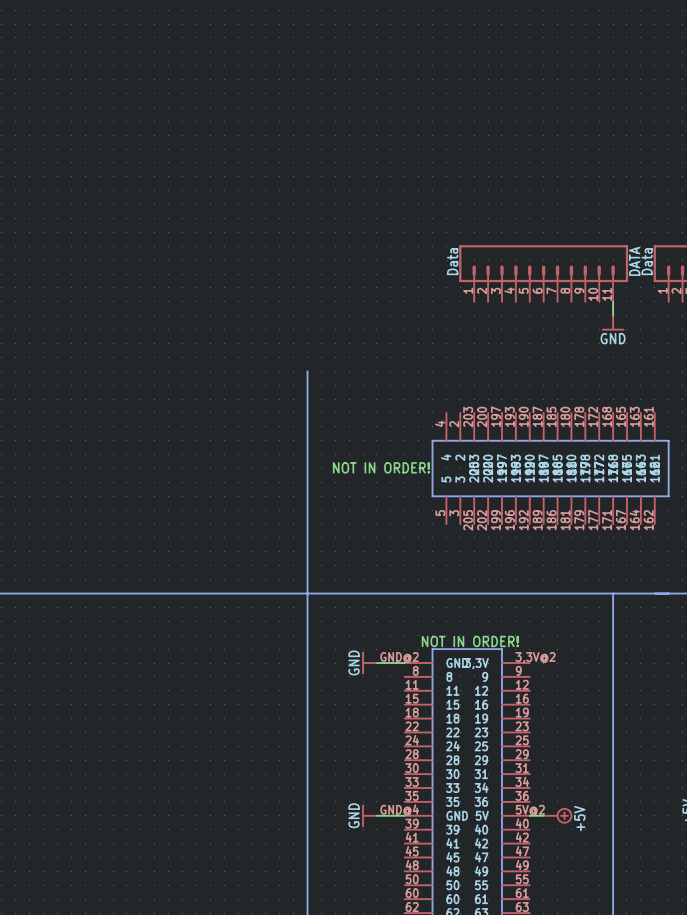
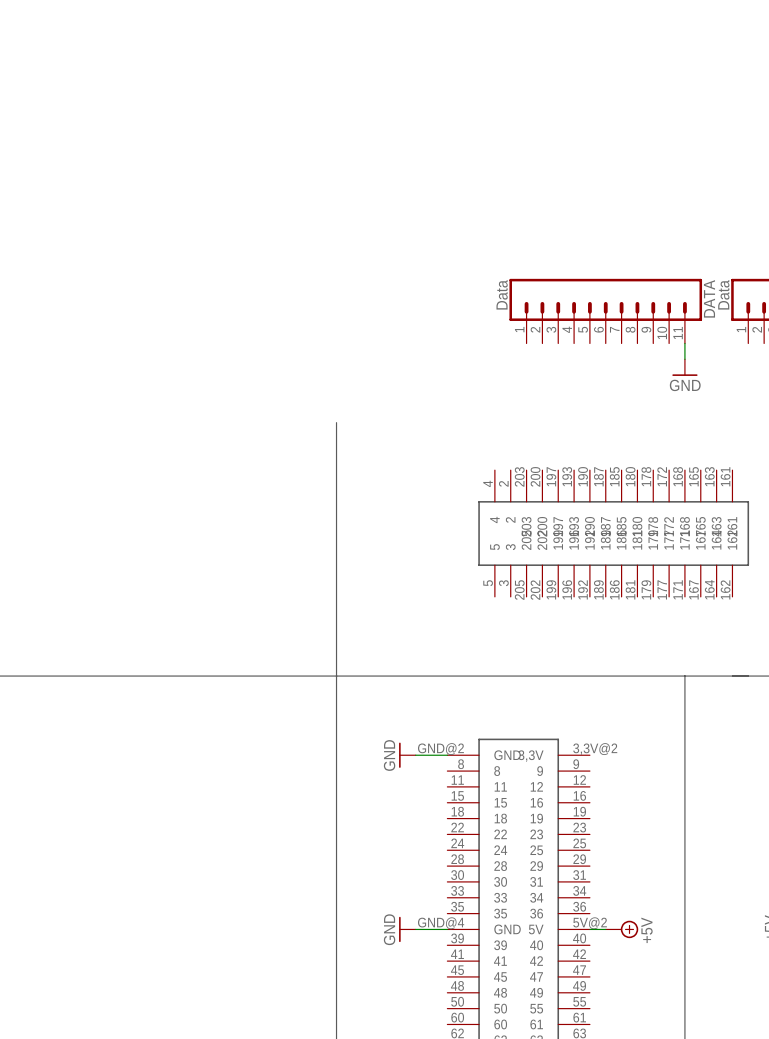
text: NOT IN ORDER! (381, 467) -> none
text: NOT IN ORDER! (470, 641) -> none

